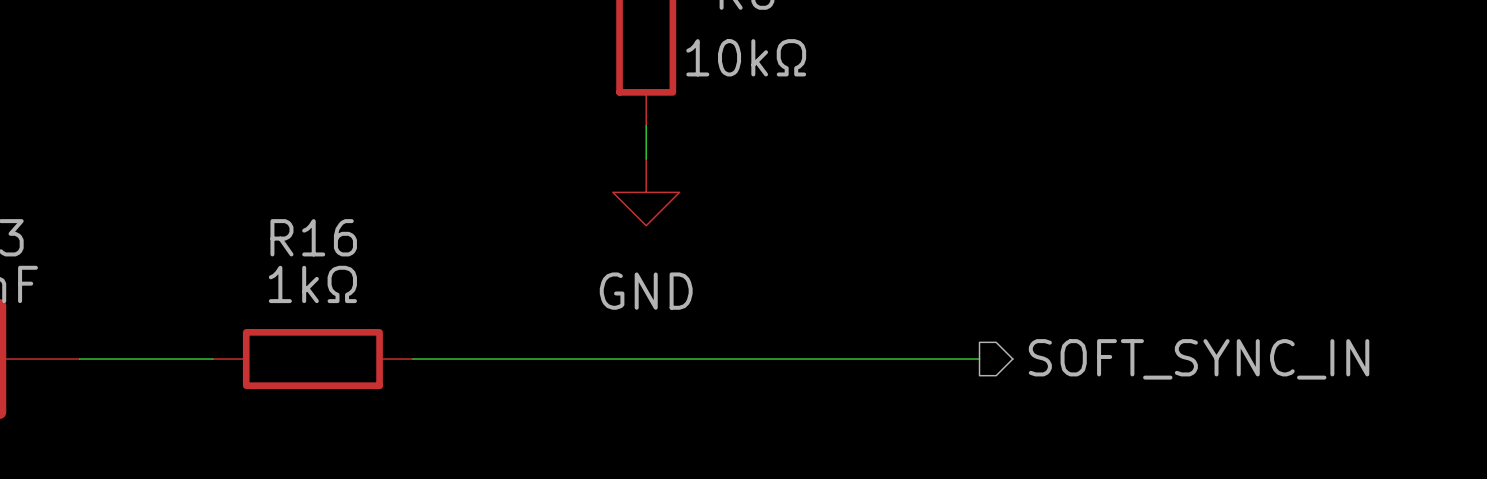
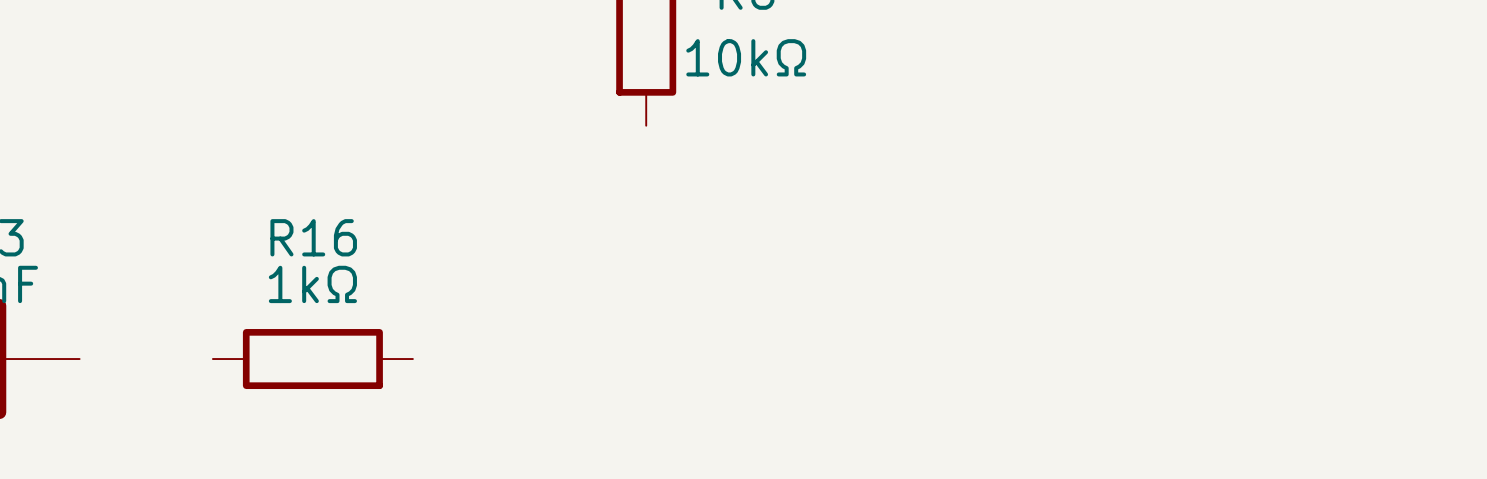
wire: (646, 125) (646, 159) -> none
power symbol: GND (646, 192) -> none
wire: (79, 359) (212, 359) -> none
wire: (412, 359) (979, 359) -> none
hierarchical label: SOFT_SYNC_IN (1199, 359) -> none

